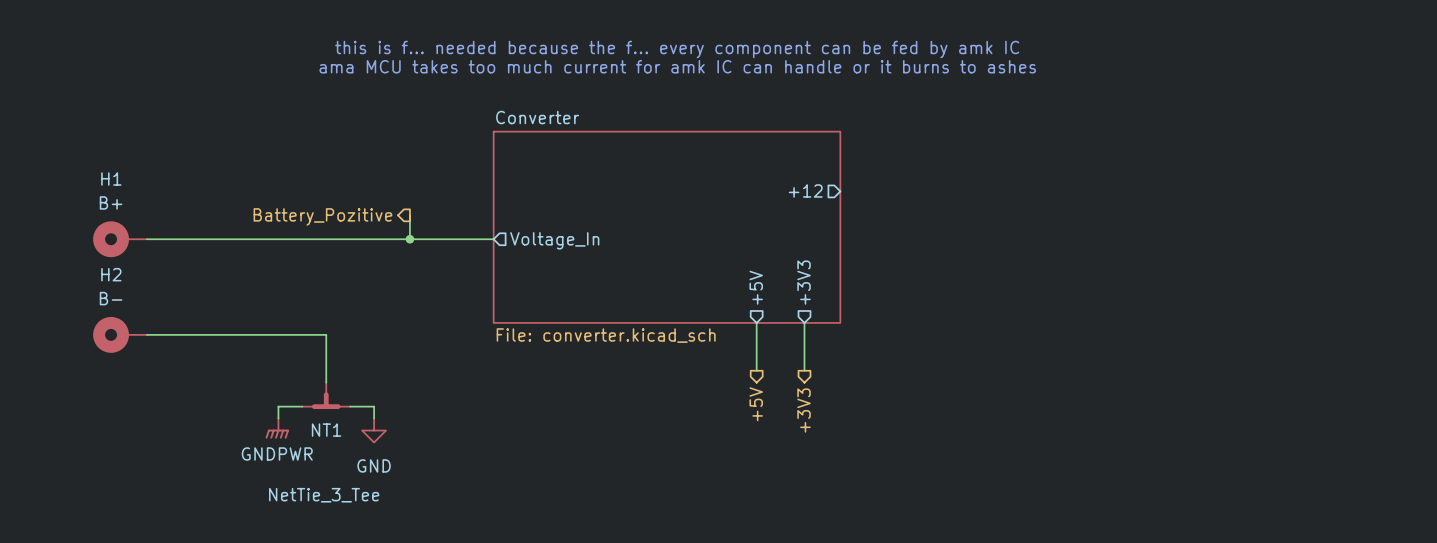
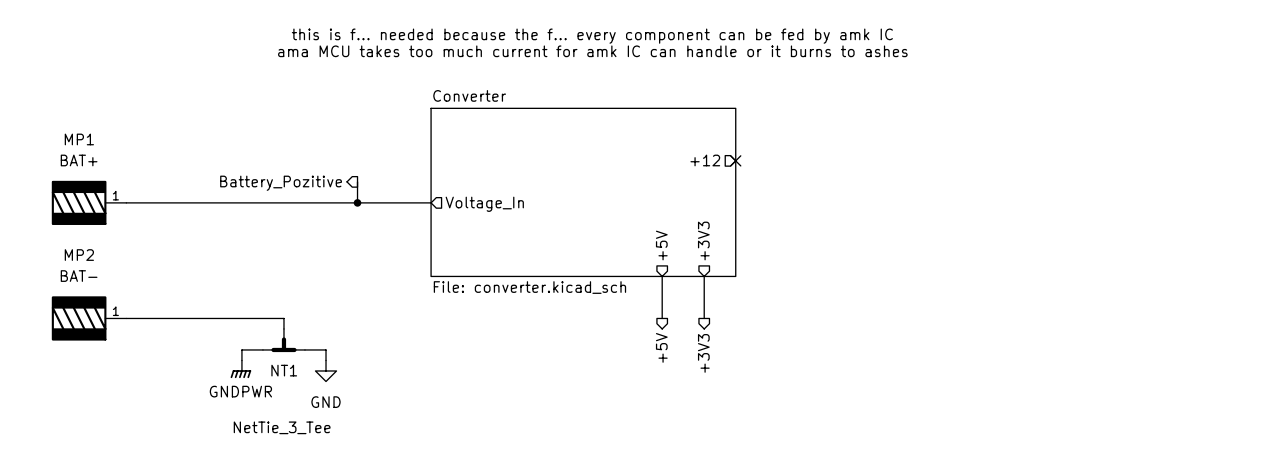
no-connect mark: none -> (735, 160)
MP1: none -> BAT+ (89, 202)
H1: B+ (120, 239) -> none
H2: B- (120, 334) -> none
wire: (146, 334) (326, 334) (326, 370) -> (126, 318) (283, 318)
MP2: none -> BAT- (89, 318)

